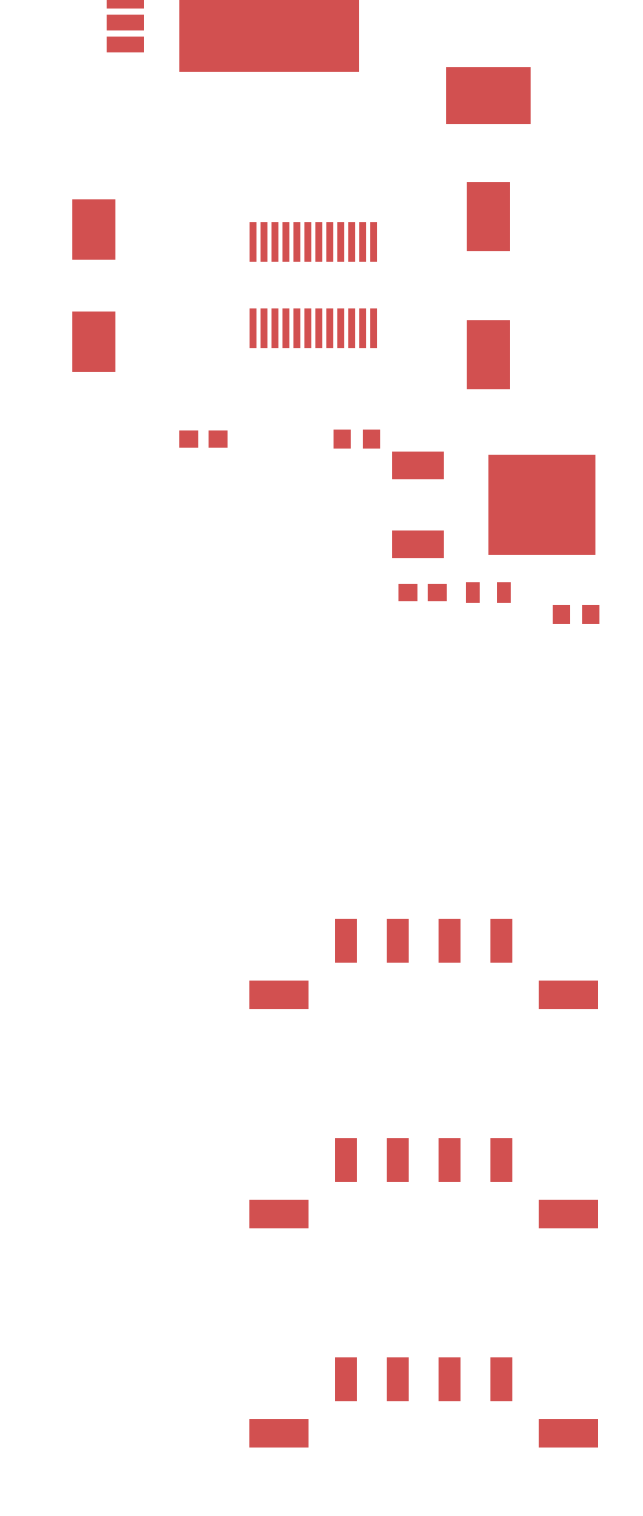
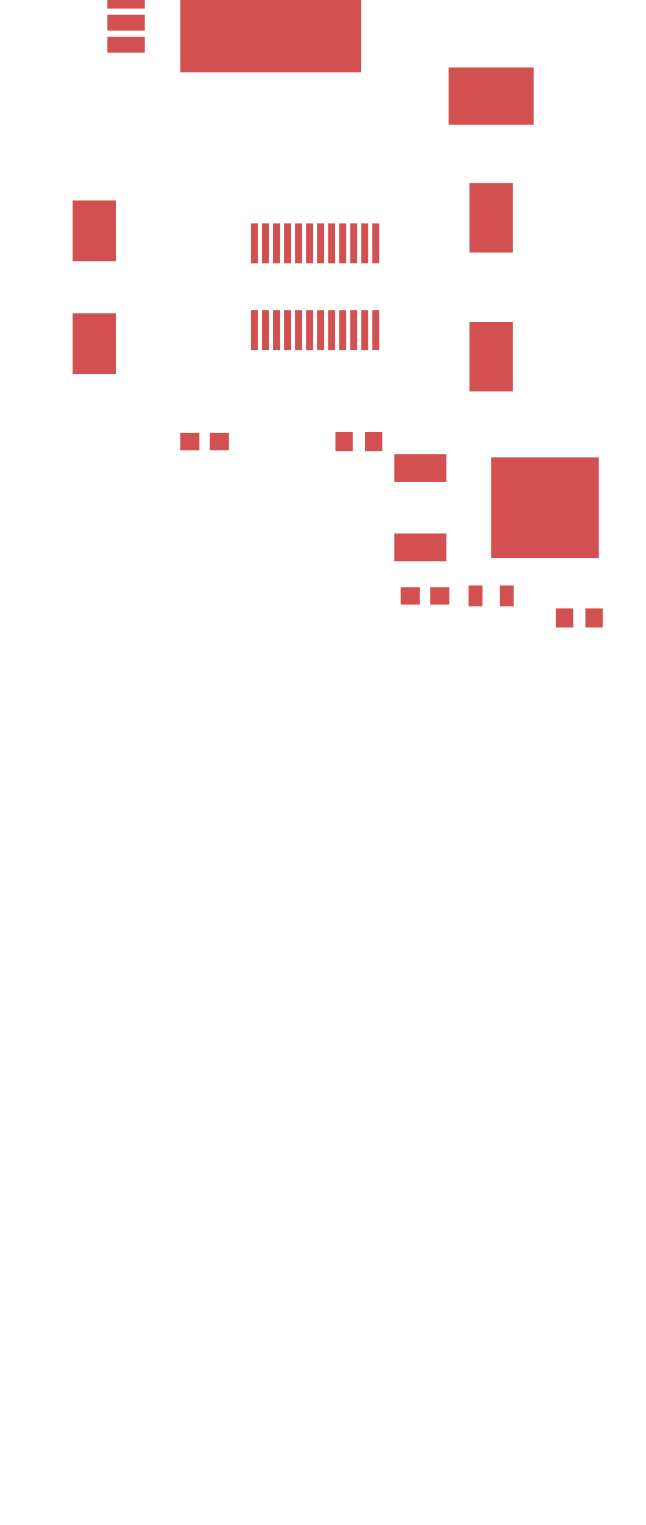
part: (423, 963) -> none
part: (423, 1183) -> none
part: (423, 1402) -> none

